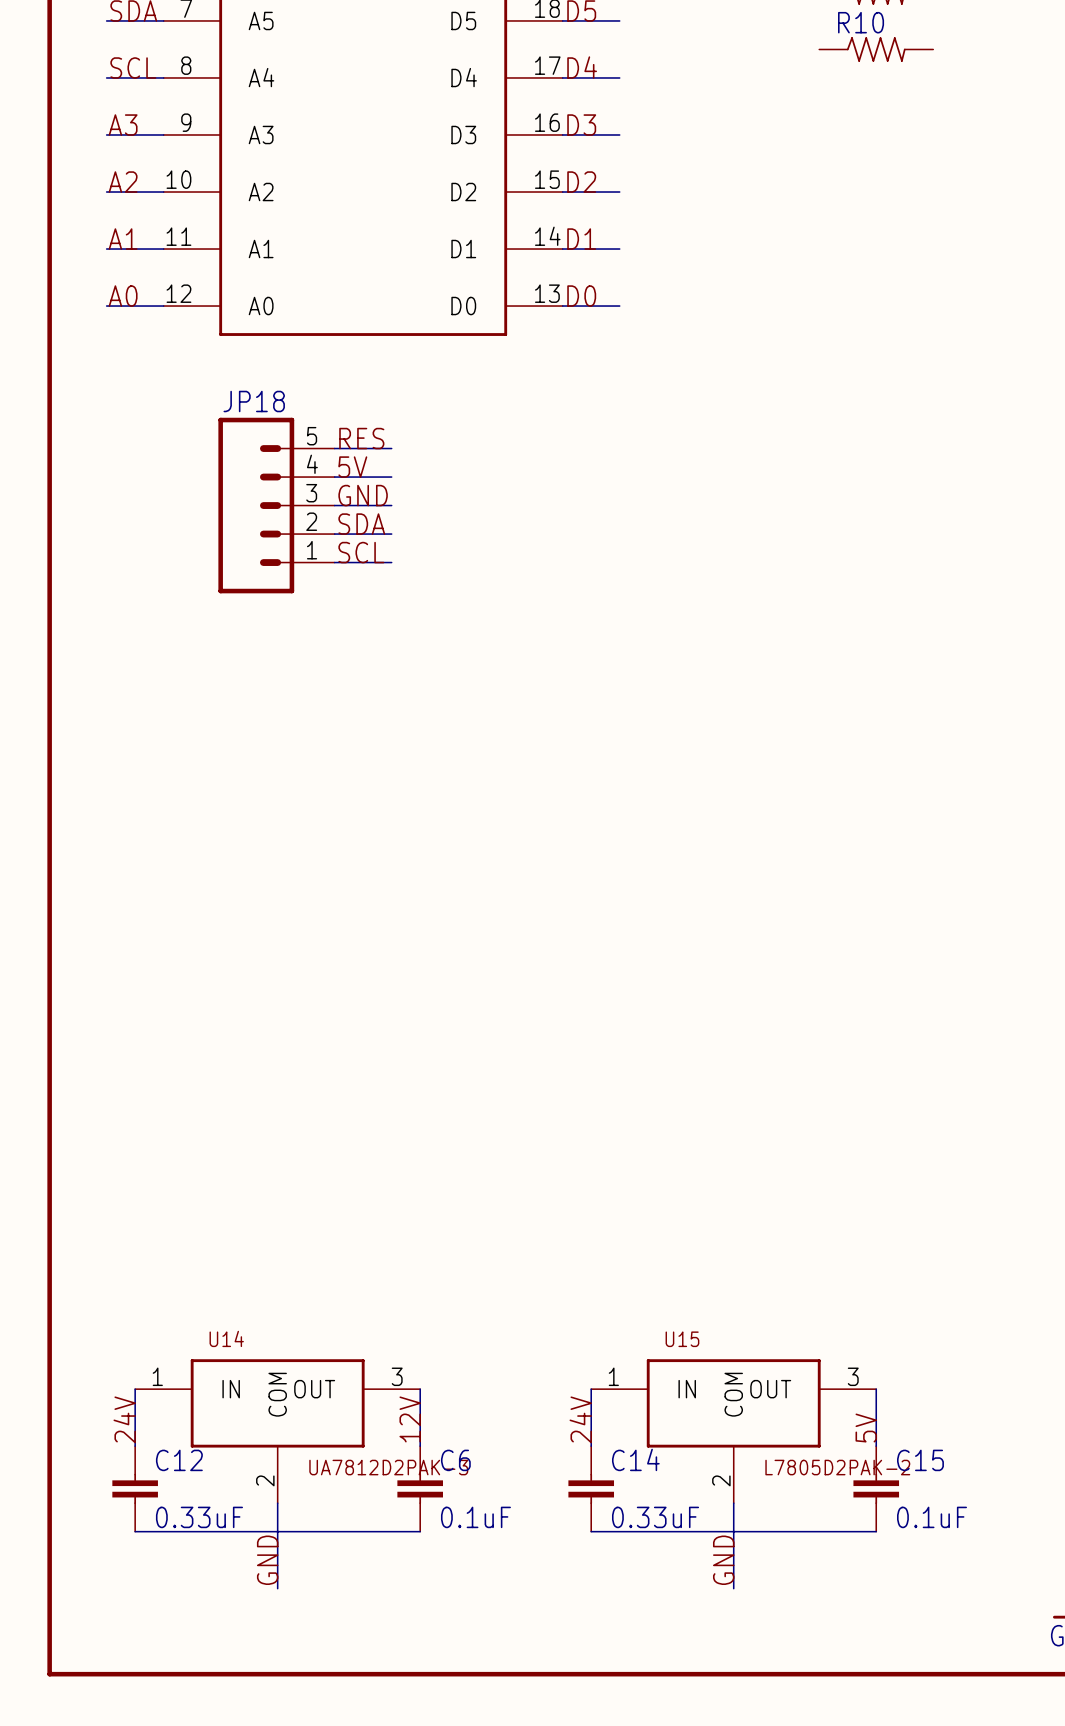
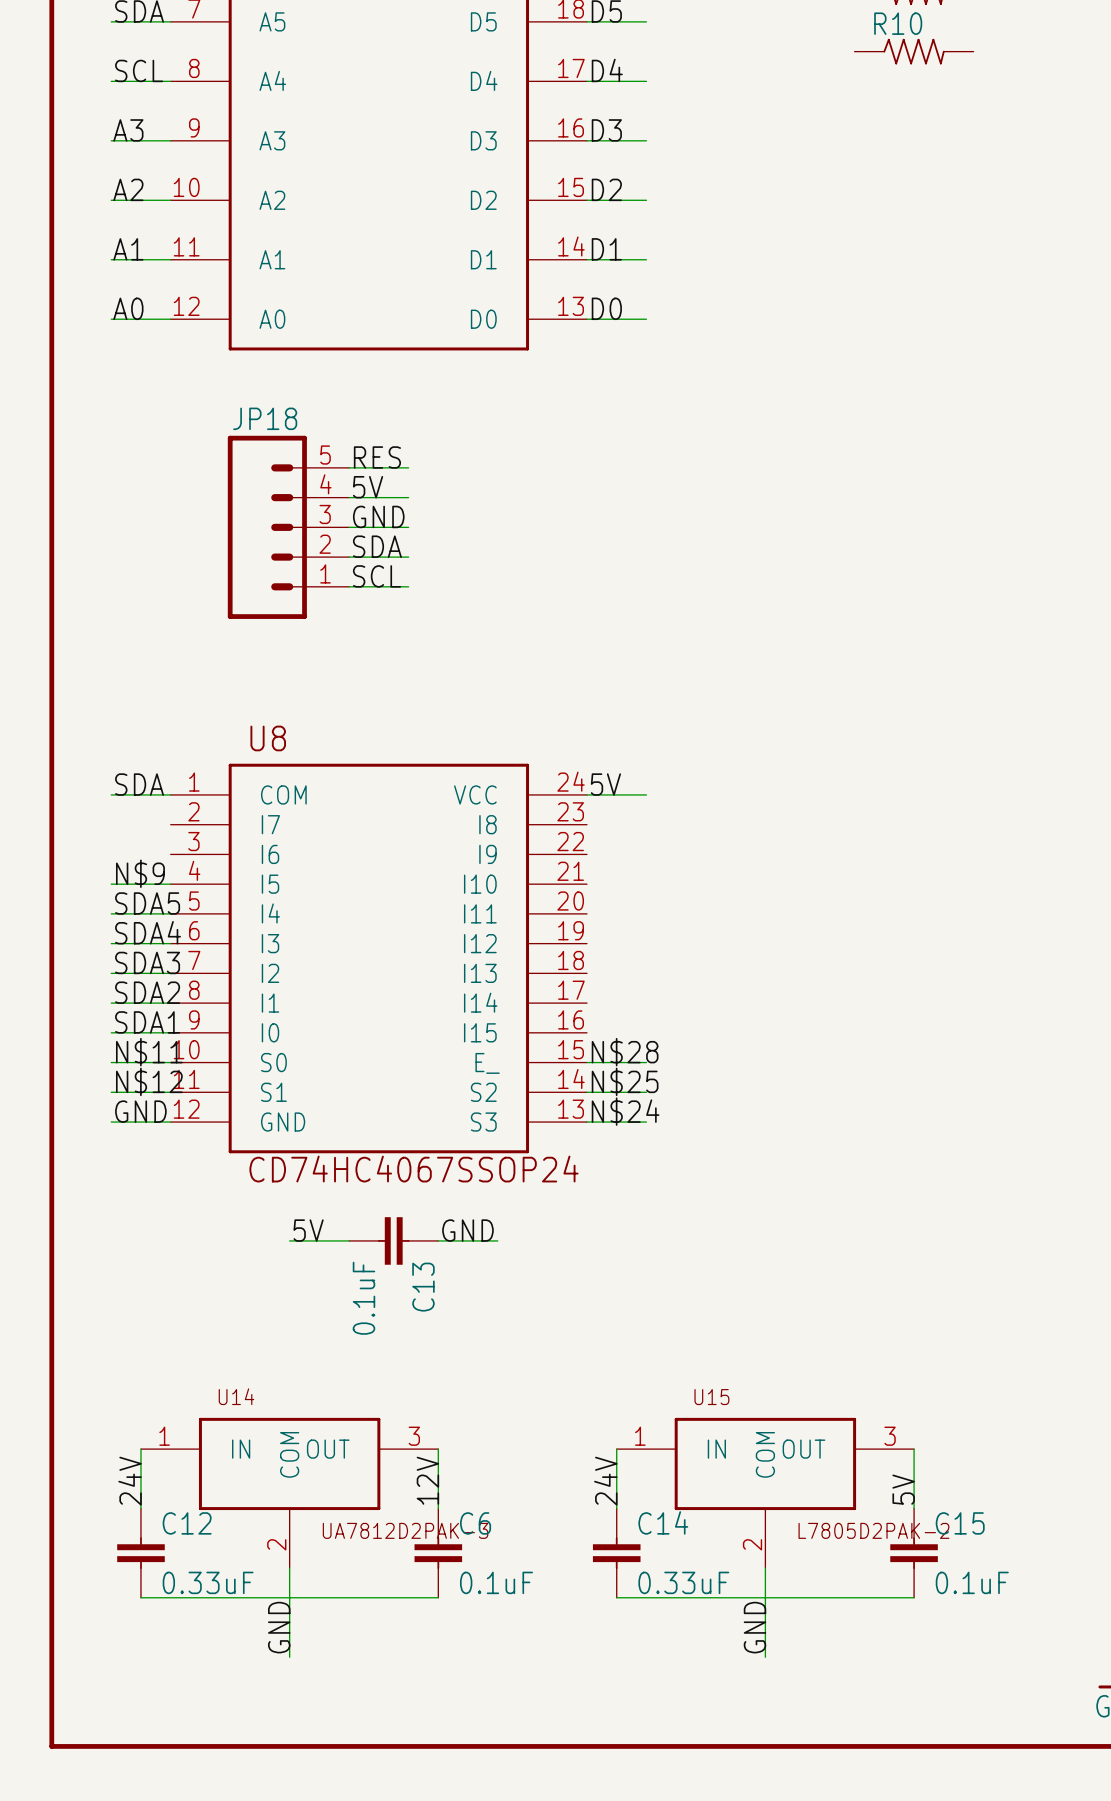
label: none -> SDA (139, 784)
label: none -> 5V (605, 784)
wire: none -> (111, 794) (170, 794)
wire: none -> (586, 794) (646, 794)
label: none -> N$9 (140, 873)
wire: none -> (111, 884) (170, 884)
label: none -> SDA5 (147, 903)
wire: none -> (111, 913) (170, 913)
label: none -> SDA4 (148, 932)
wire: none -> (111, 943) (170, 943)
U8: none -> CD74HC4067SSOP24 (378, 958)
label: none -> SDA3 (147, 962)
wire: none -> (111, 973) (170, 973)
label: none -> SDA2 (147, 992)
wire: none -> (111, 1003) (170, 1003)
label: none -> SDA1 (147, 1022)
wire: none -> (111, 1032) (170, 1032)
label: none -> N$11 (149, 1052)
label: none -> N$28 (625, 1052)
wire: none -> (111, 1062) (170, 1062)
wire: none -> (586, 1062) (646, 1062)
label: none -> N$12 (149, 1081)
label: none -> N$25 (625, 1081)
wire: none -> (111, 1092) (170, 1092)
wire: none -> (586, 1092) (646, 1092)
label: none -> GND (140, 1111)
label: none -> N$24 (625, 1111)
wire: none -> (111, 1122) (170, 1122)
wire: none -> (586, 1122) (646, 1122)
label: none -> 5V (308, 1230)
label: none -> GND (467, 1230)
wire: none -> (289, 1240) (349, 1240)
C13: none -> 0.1uF (393, 1240)
wire: none -> (438, 1240) (497, 1240)

